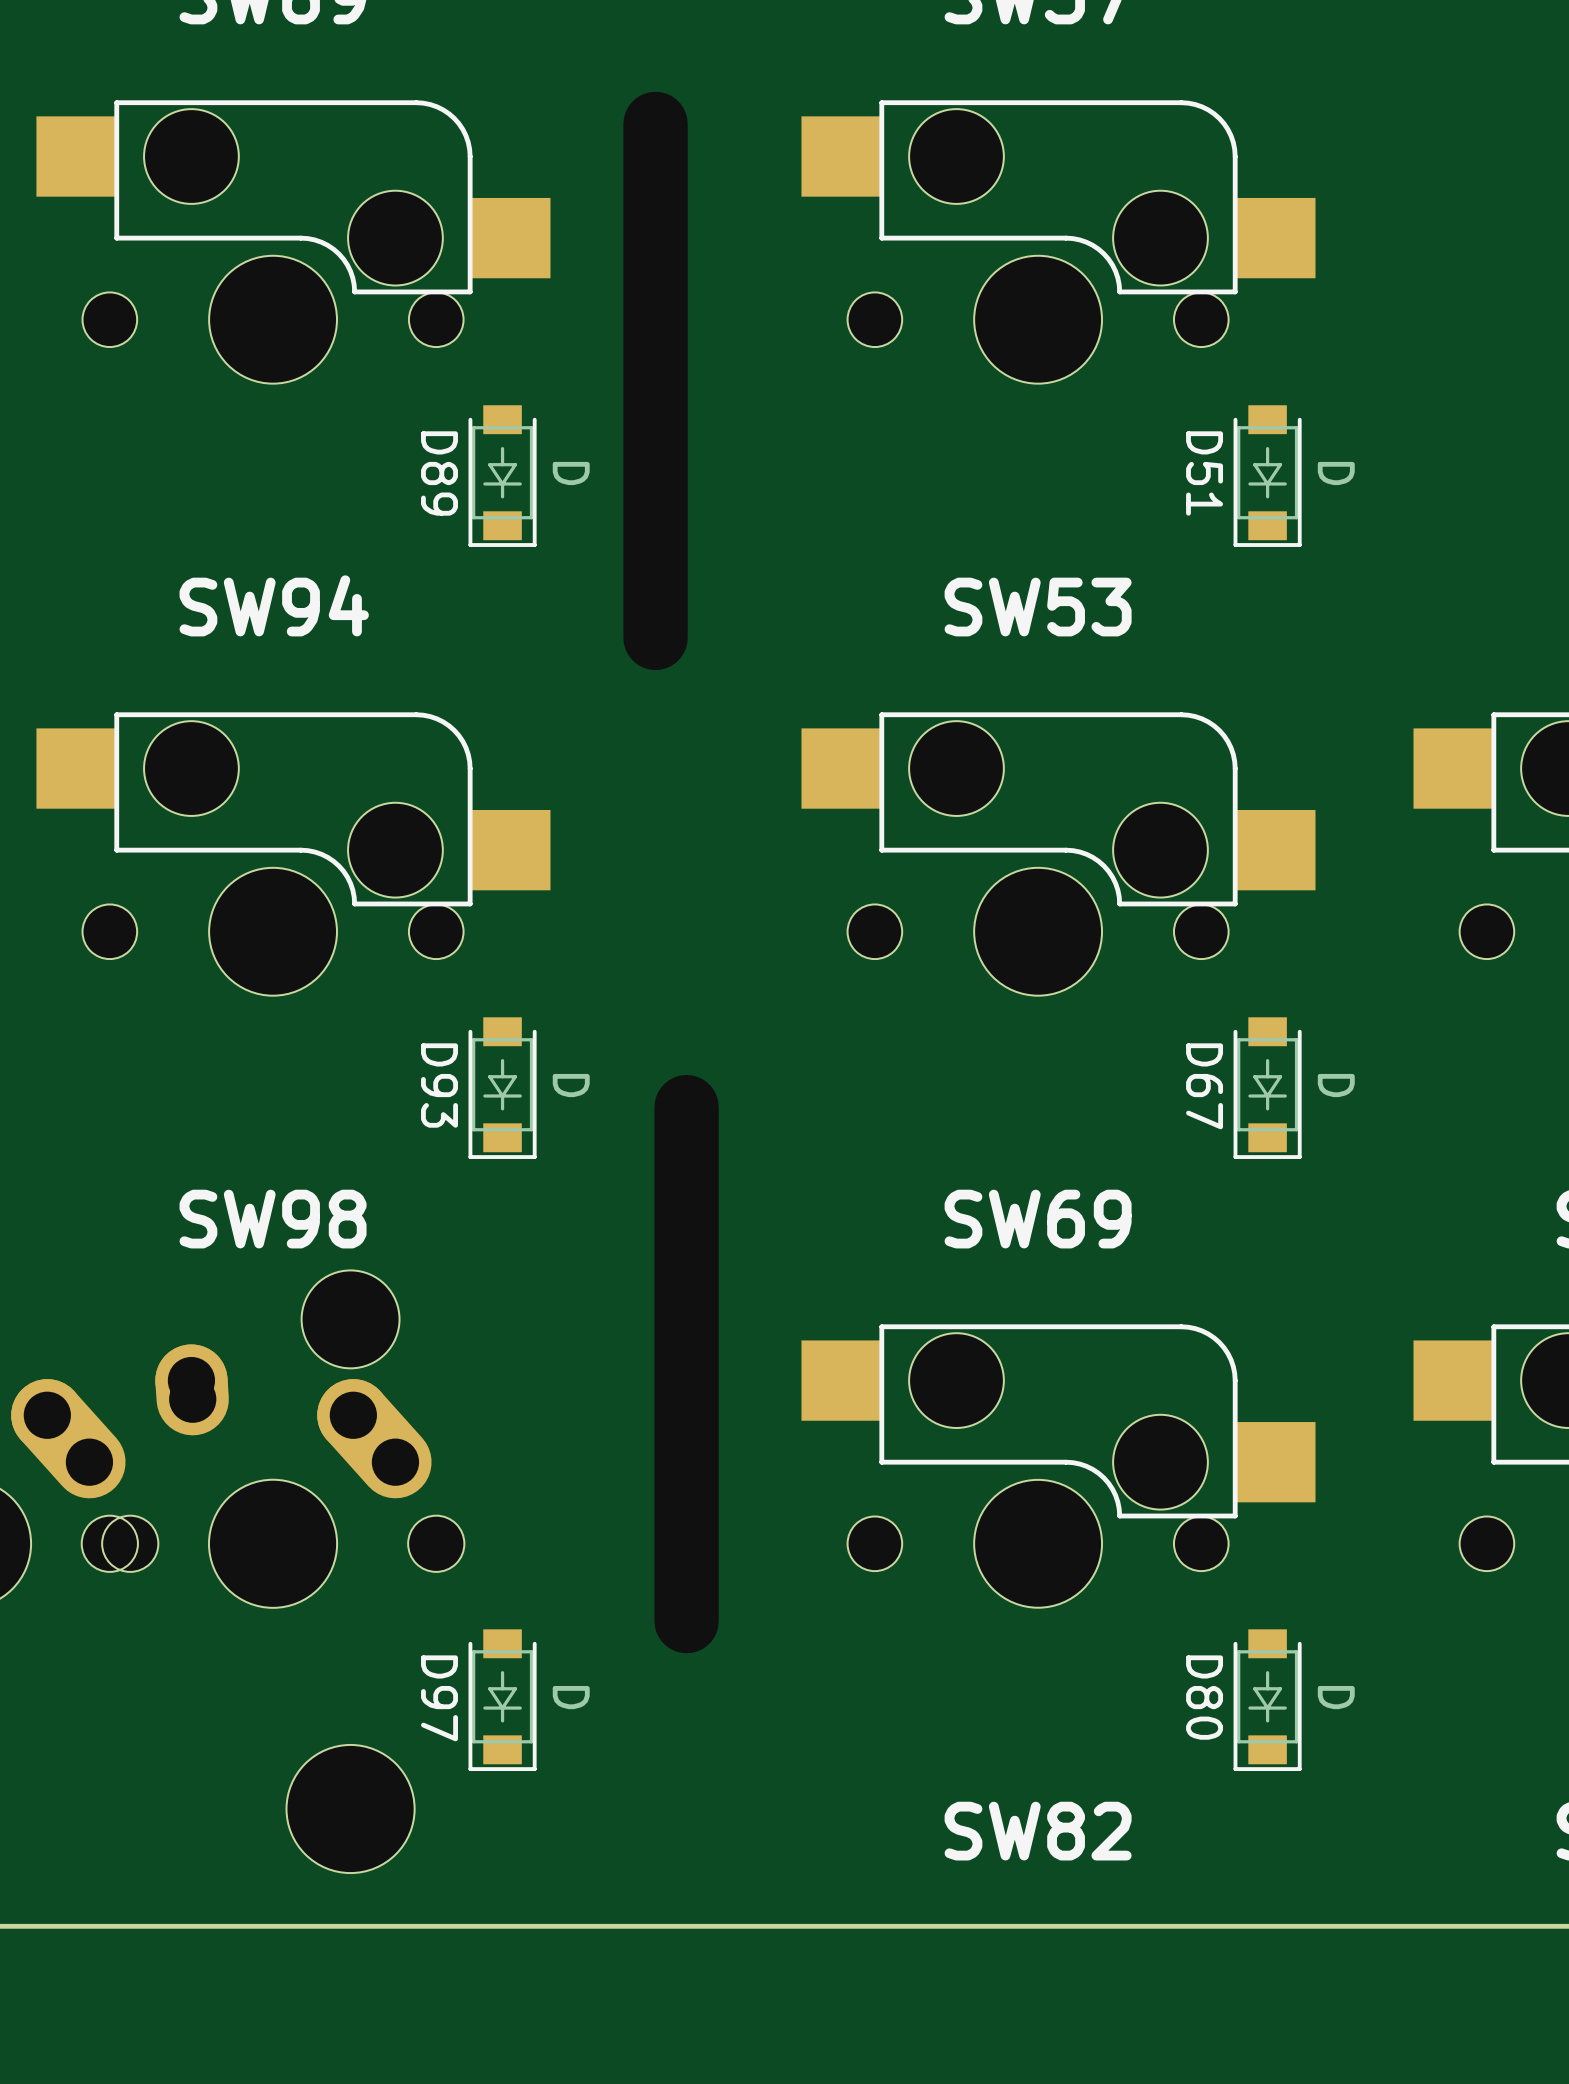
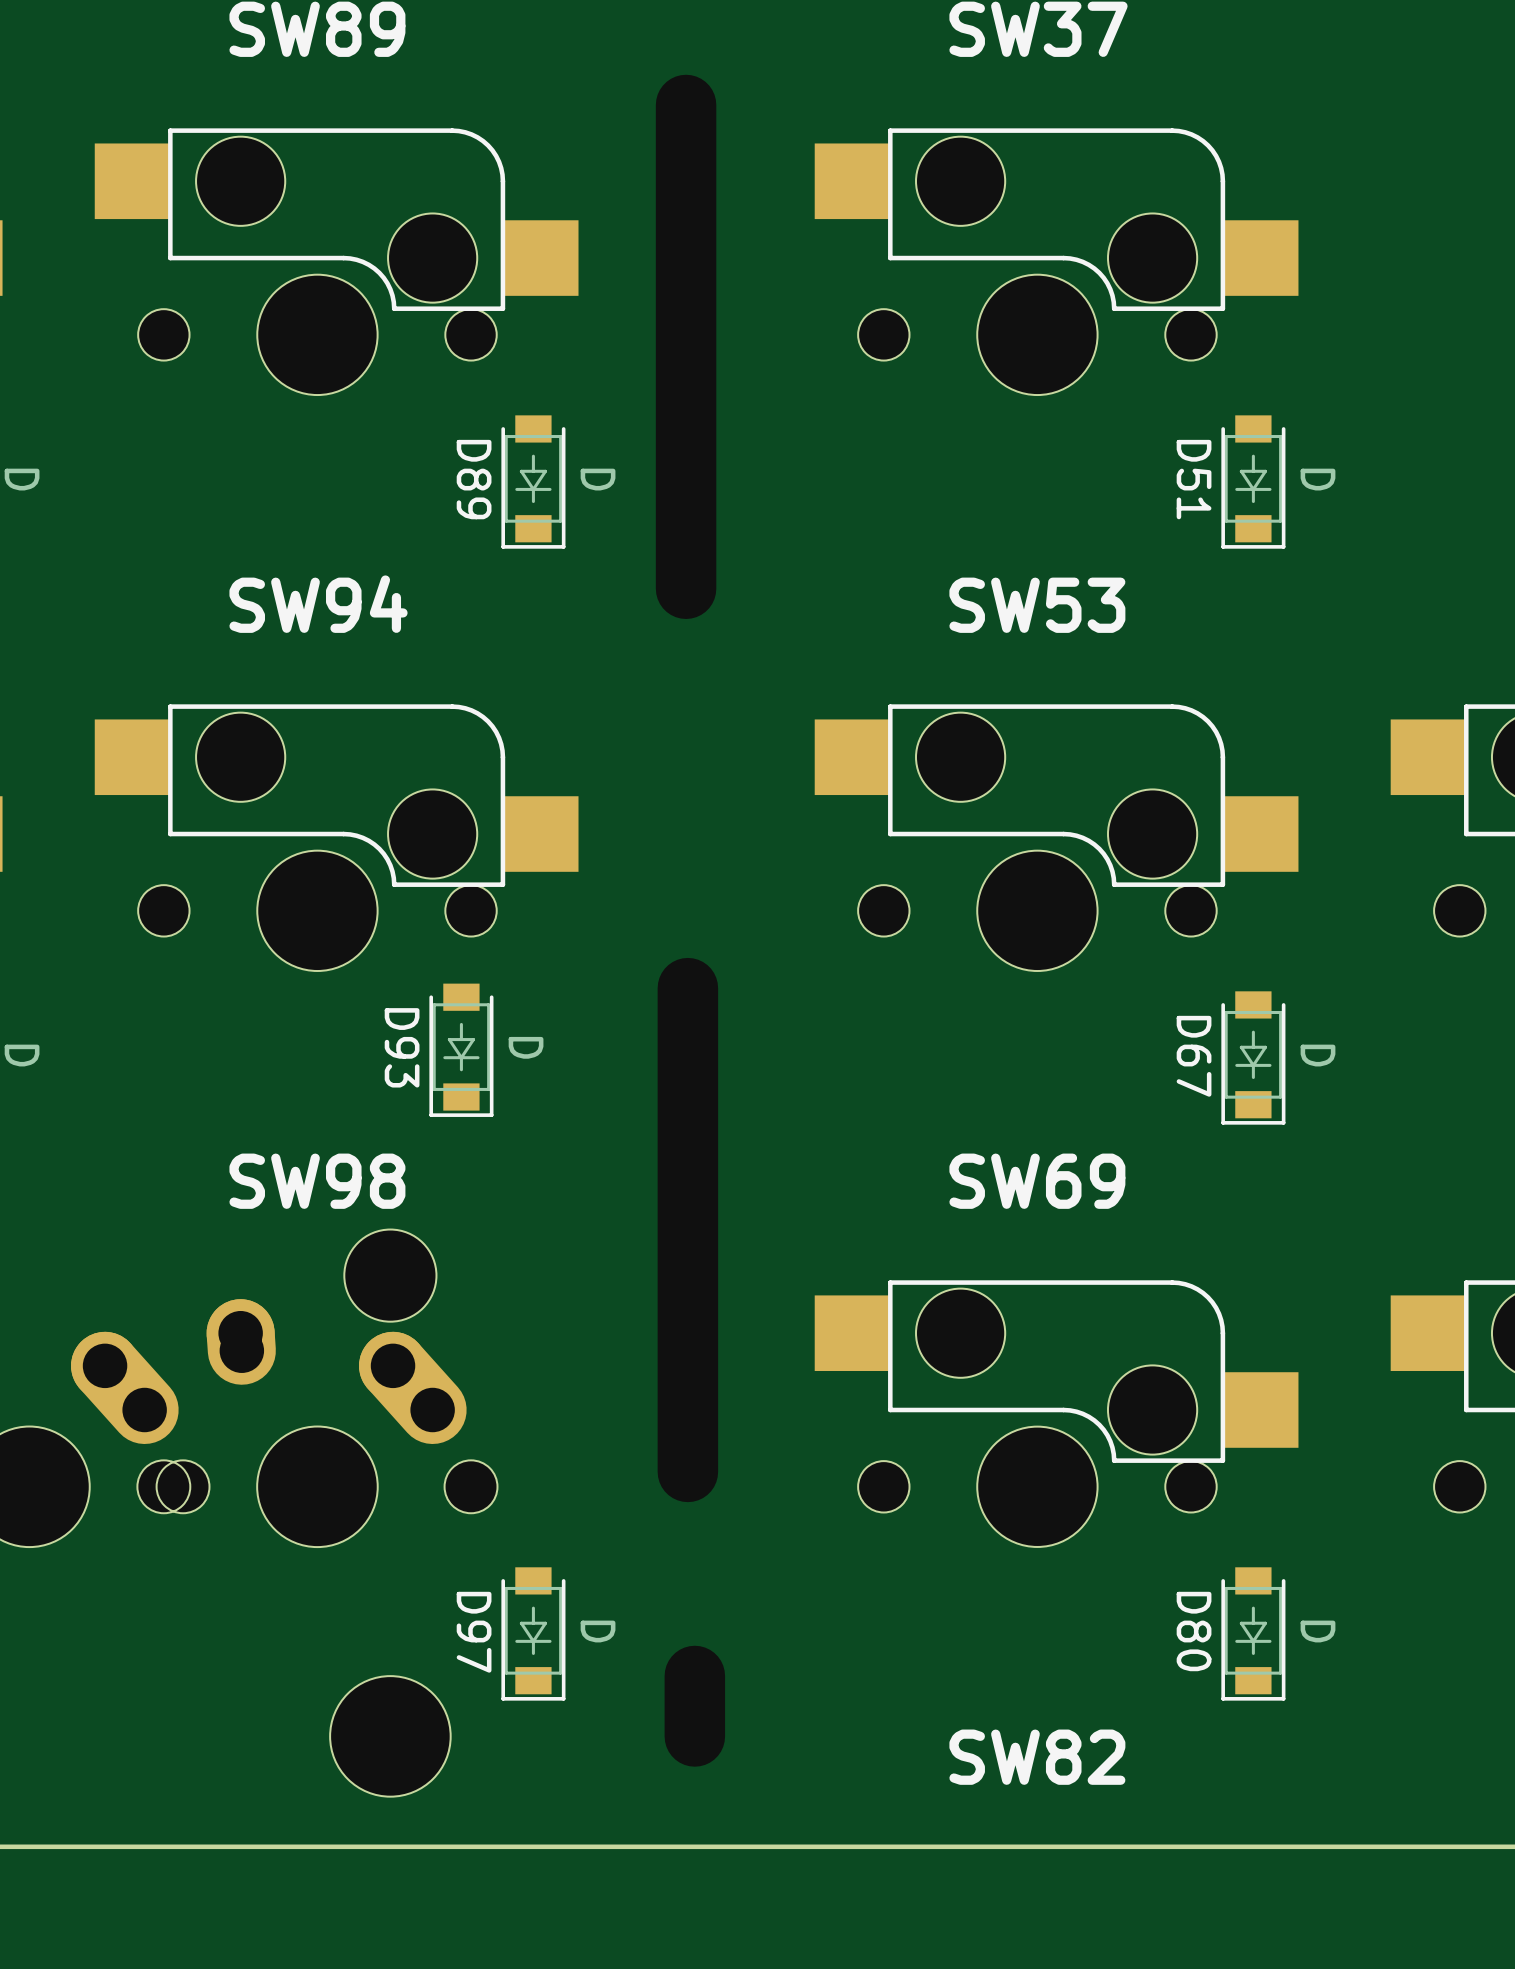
part position: (655, 380) -> (686, 346)
D93 position: (502, 1088) -> (461, 1050)
part position: (686, 1364) -> (687, 1230)
part: none -> (694, 1706)

